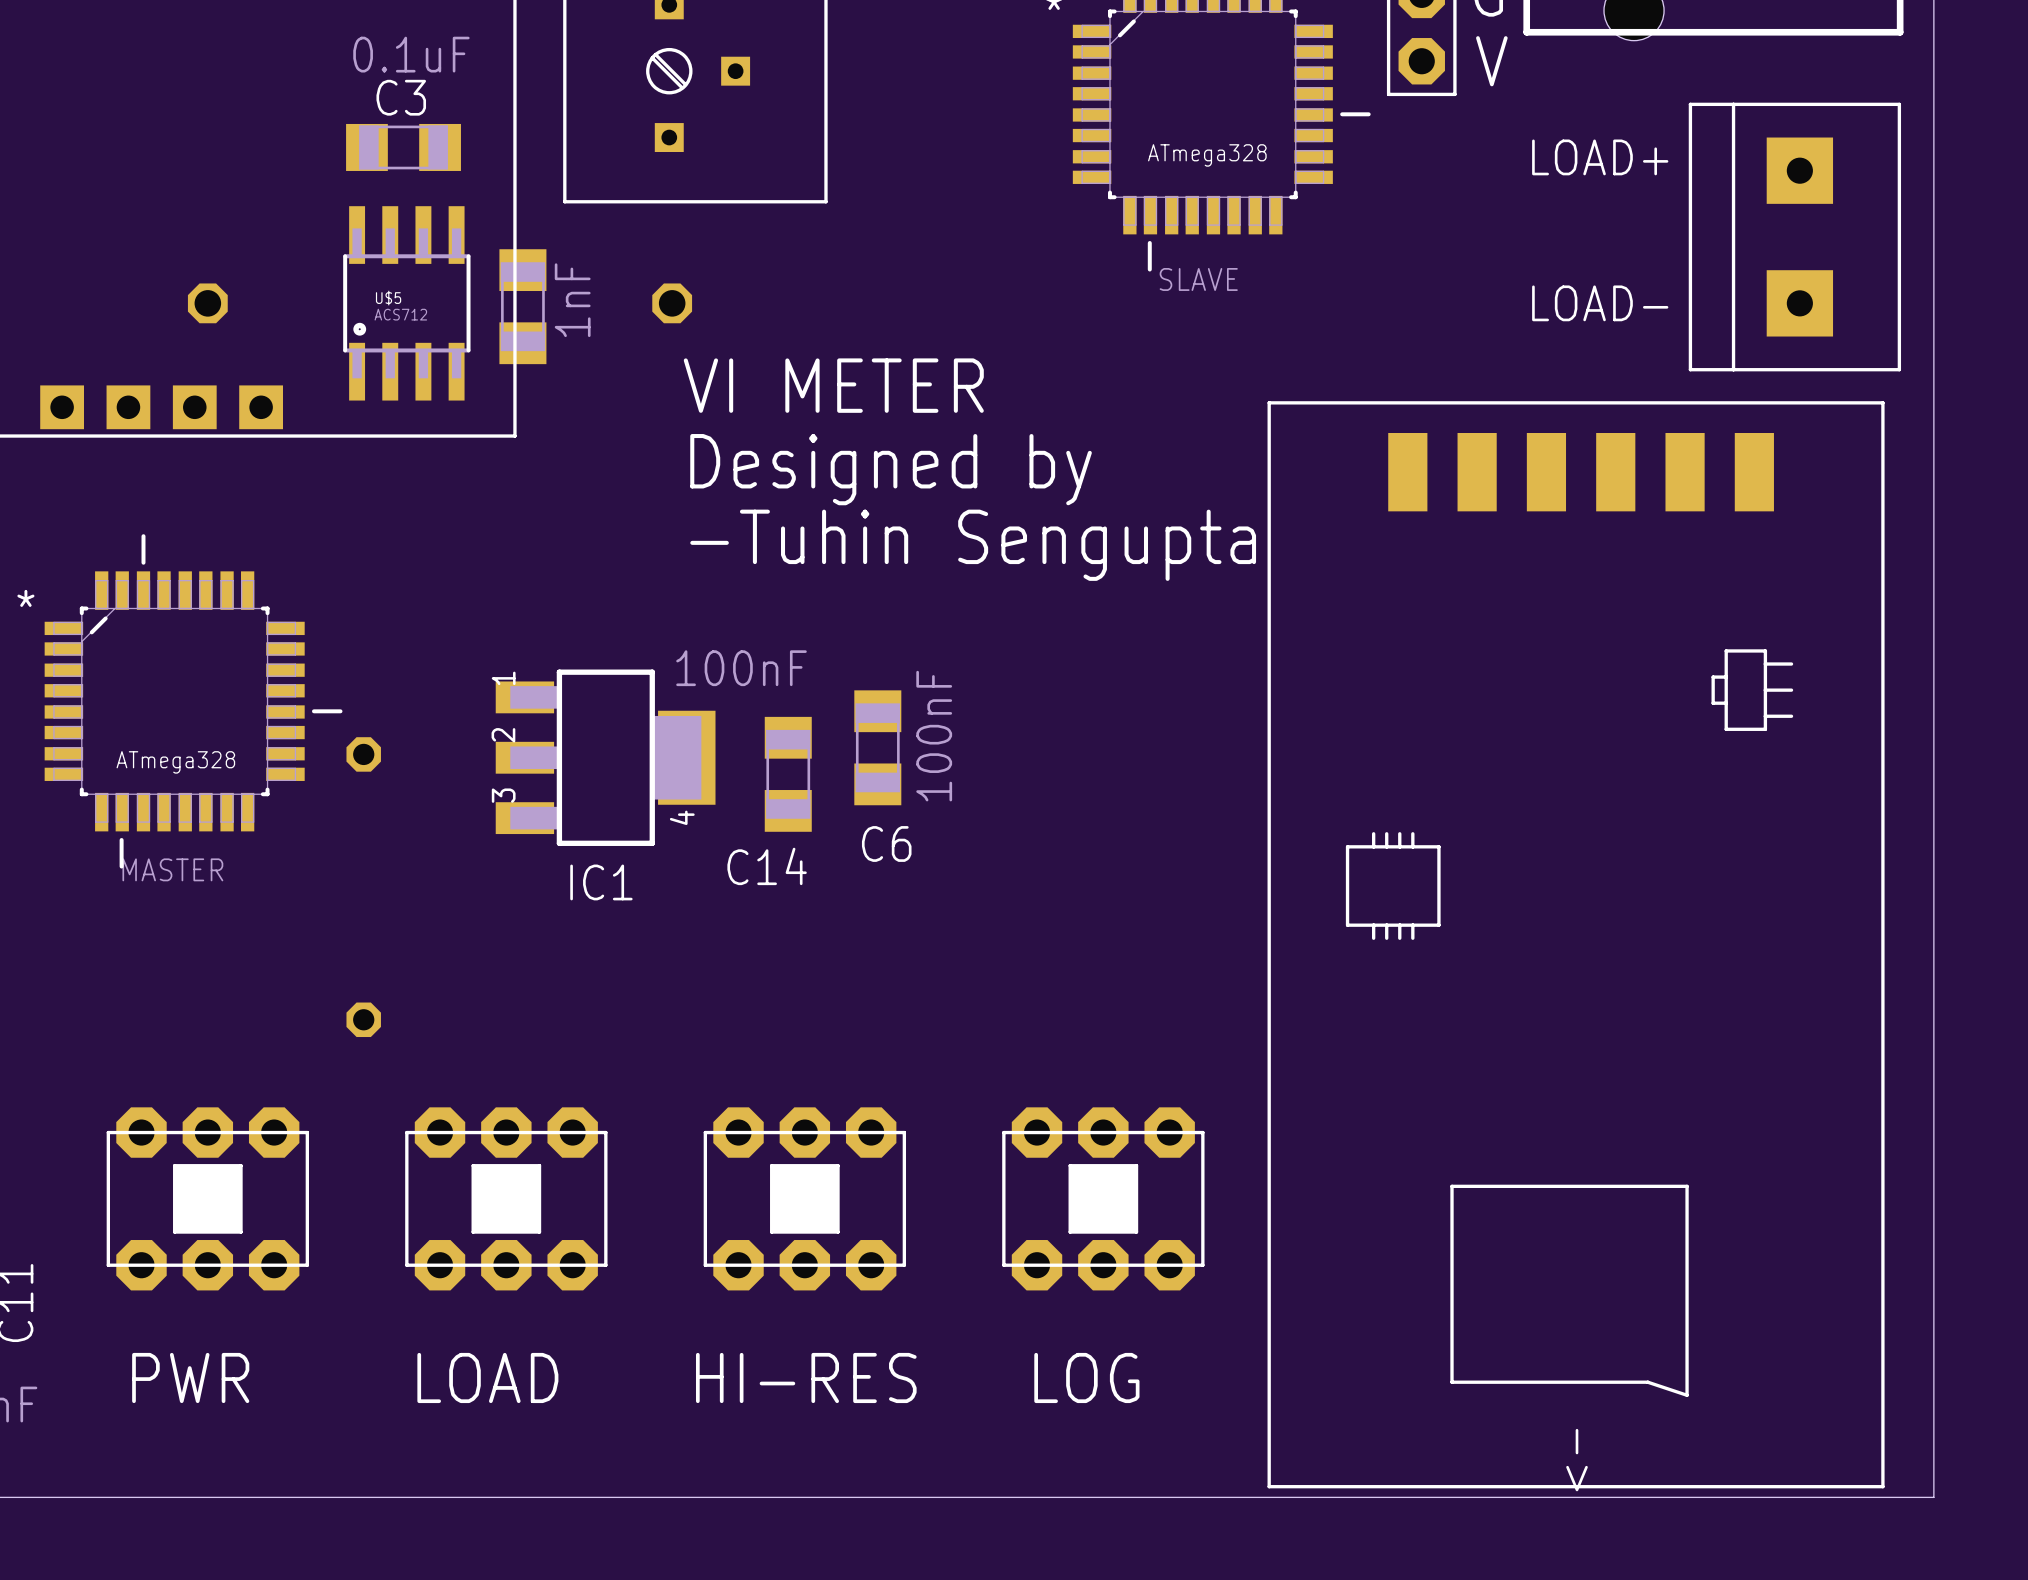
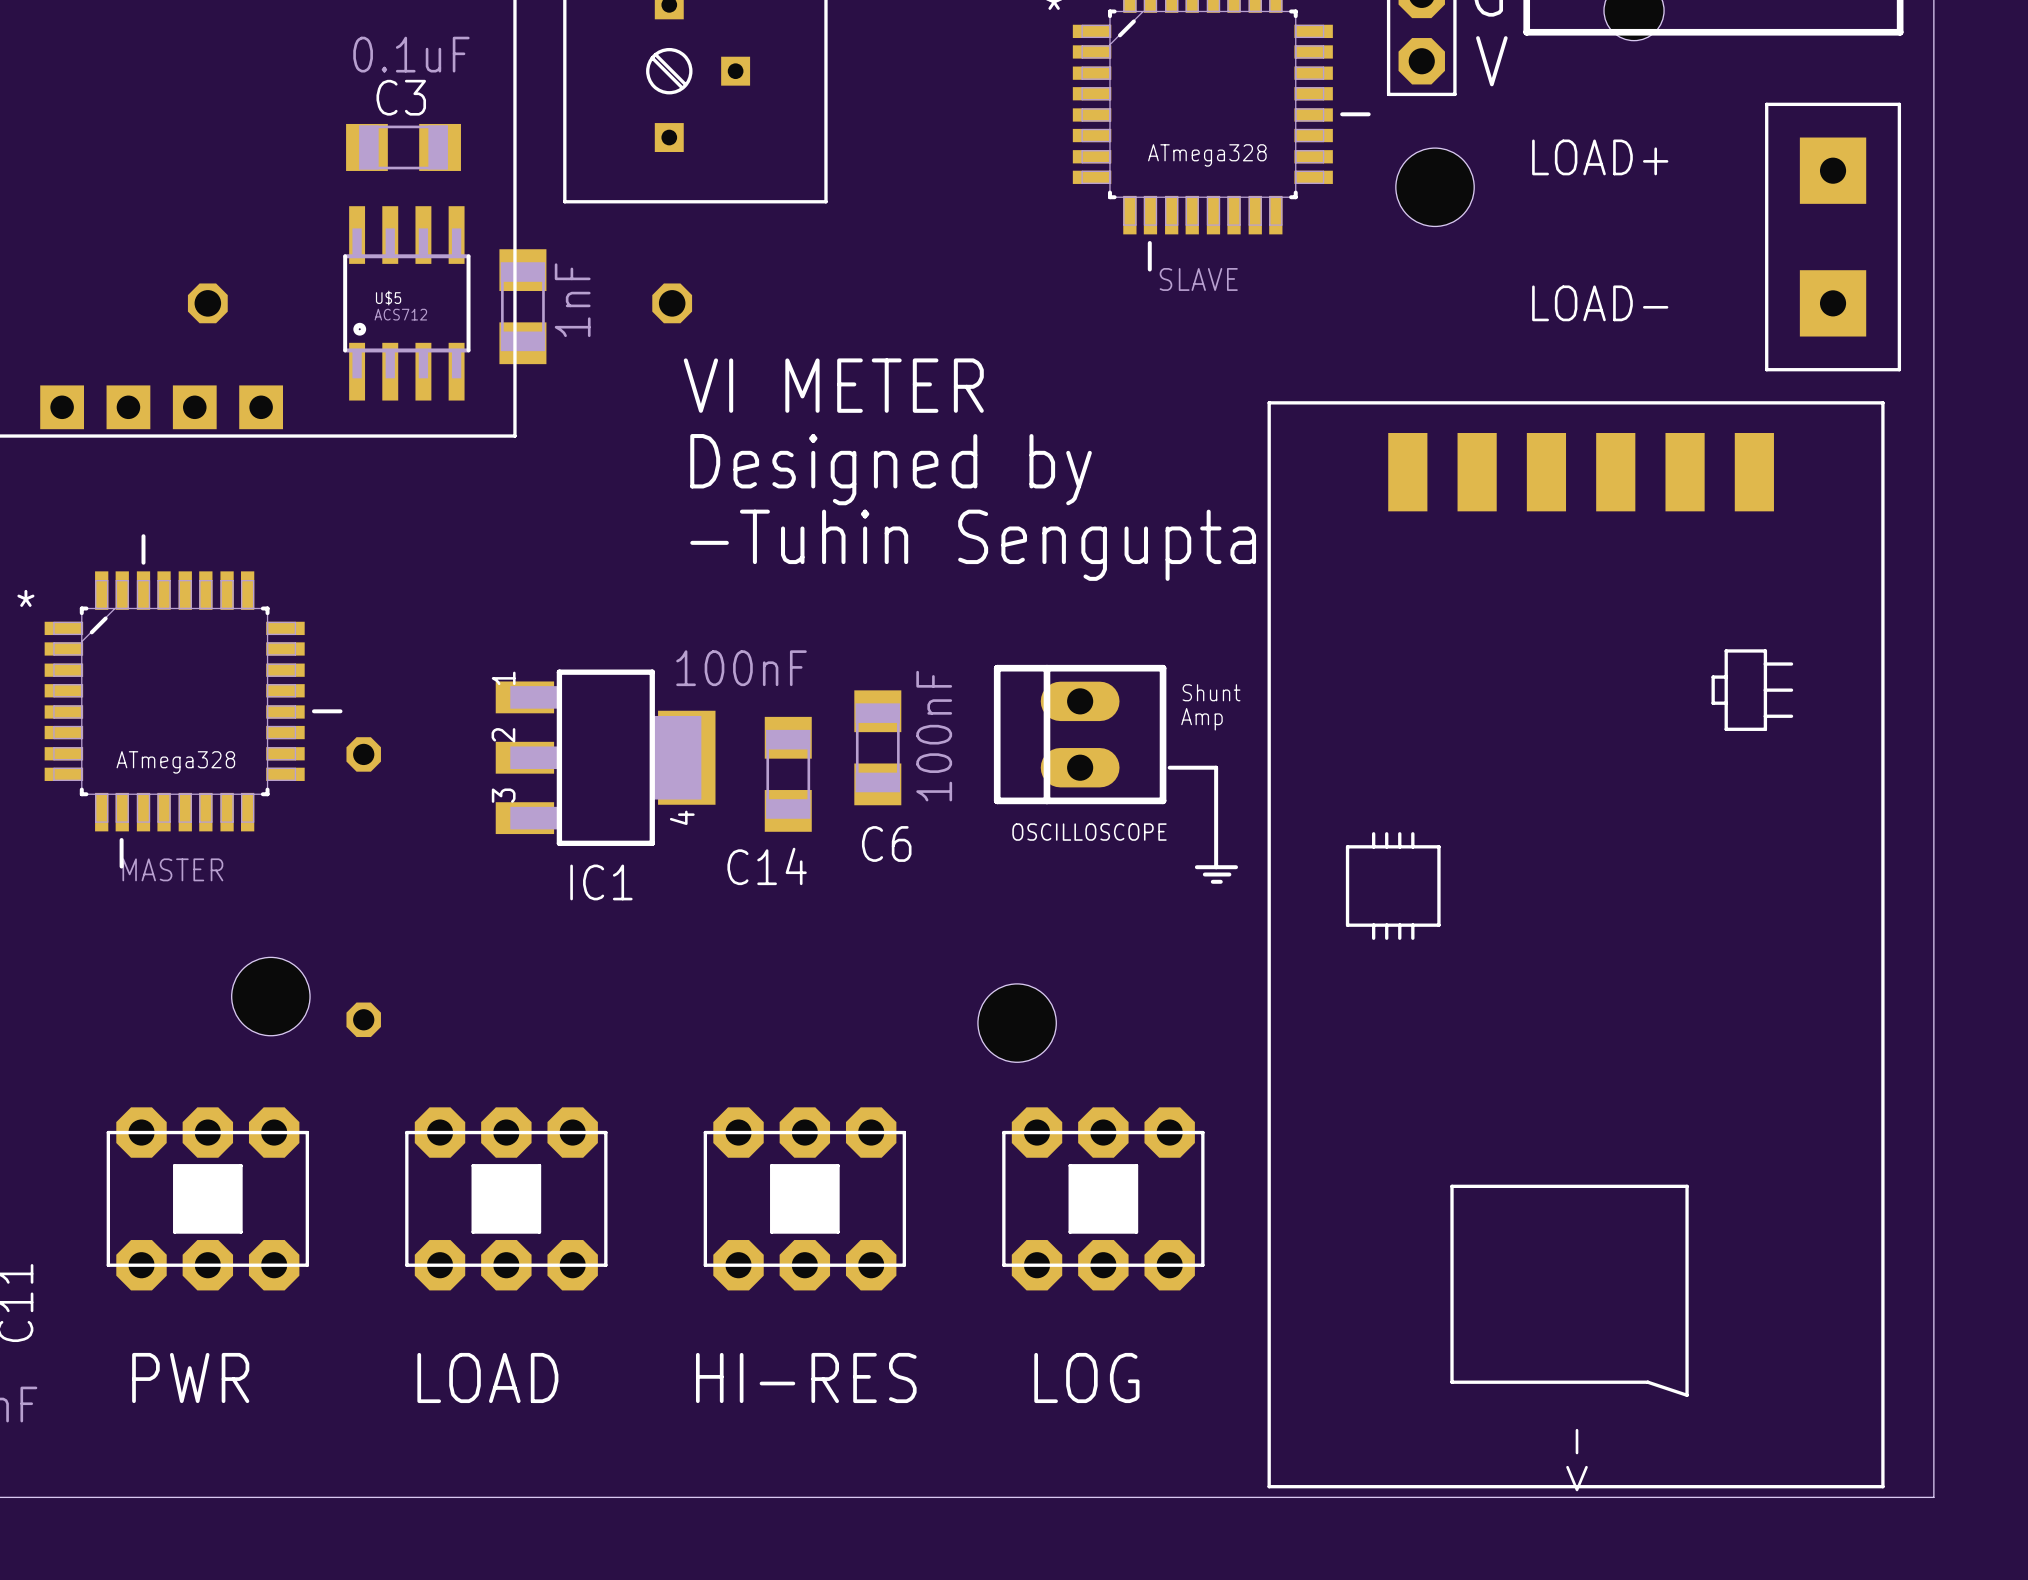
hole: none -> (1435, 187)
part: (1794, 237) -> none
part: none -> (1833, 237)
text: none -> Shunt (1211, 692)
text: none -> Amp (1201, 719)
OSCILLOSCOPE: none -> (1080, 734)
line: none -> (1169, 767) (1216, 767) (1216, 867)
line: none -> (1196, 867) (1236, 867)
line: none -> (1204, 874) (1229, 874)
line: none -> (1212, 881) (1220, 881)
hole: none -> (270, 996)
hole: none -> (1017, 1023)

